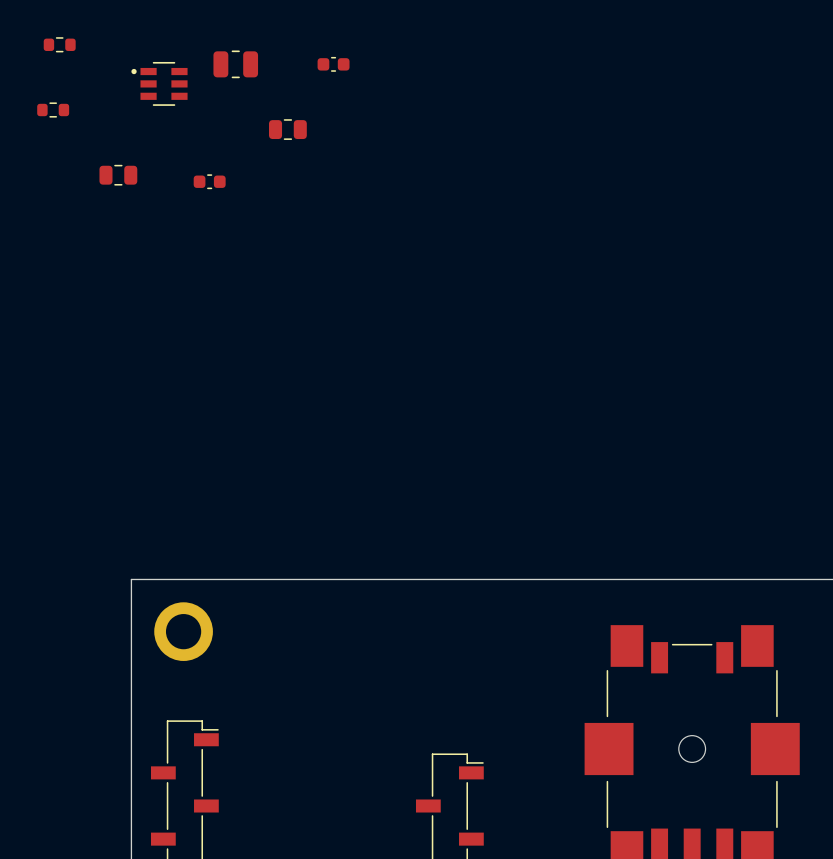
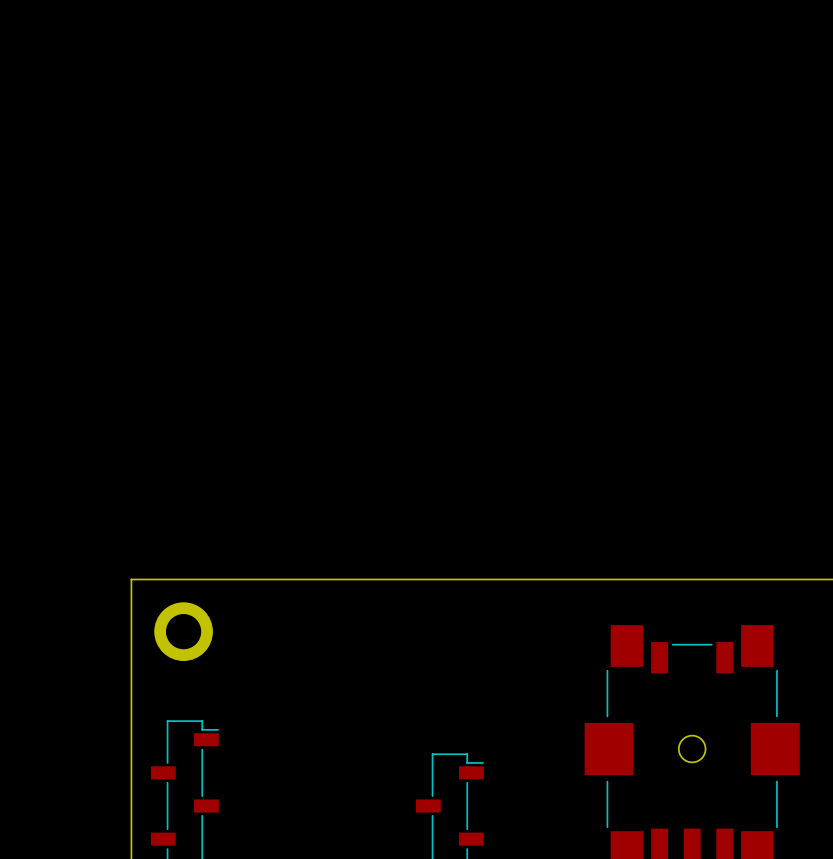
part: (59, 44) -> none
part: (235, 64) -> none
part: (333, 64) -> none
part: (159, 83) -> none
part: (53, 110) -> none
part: (287, 129) -> none
part: (118, 175) -> none
part: (209, 181) -> none

